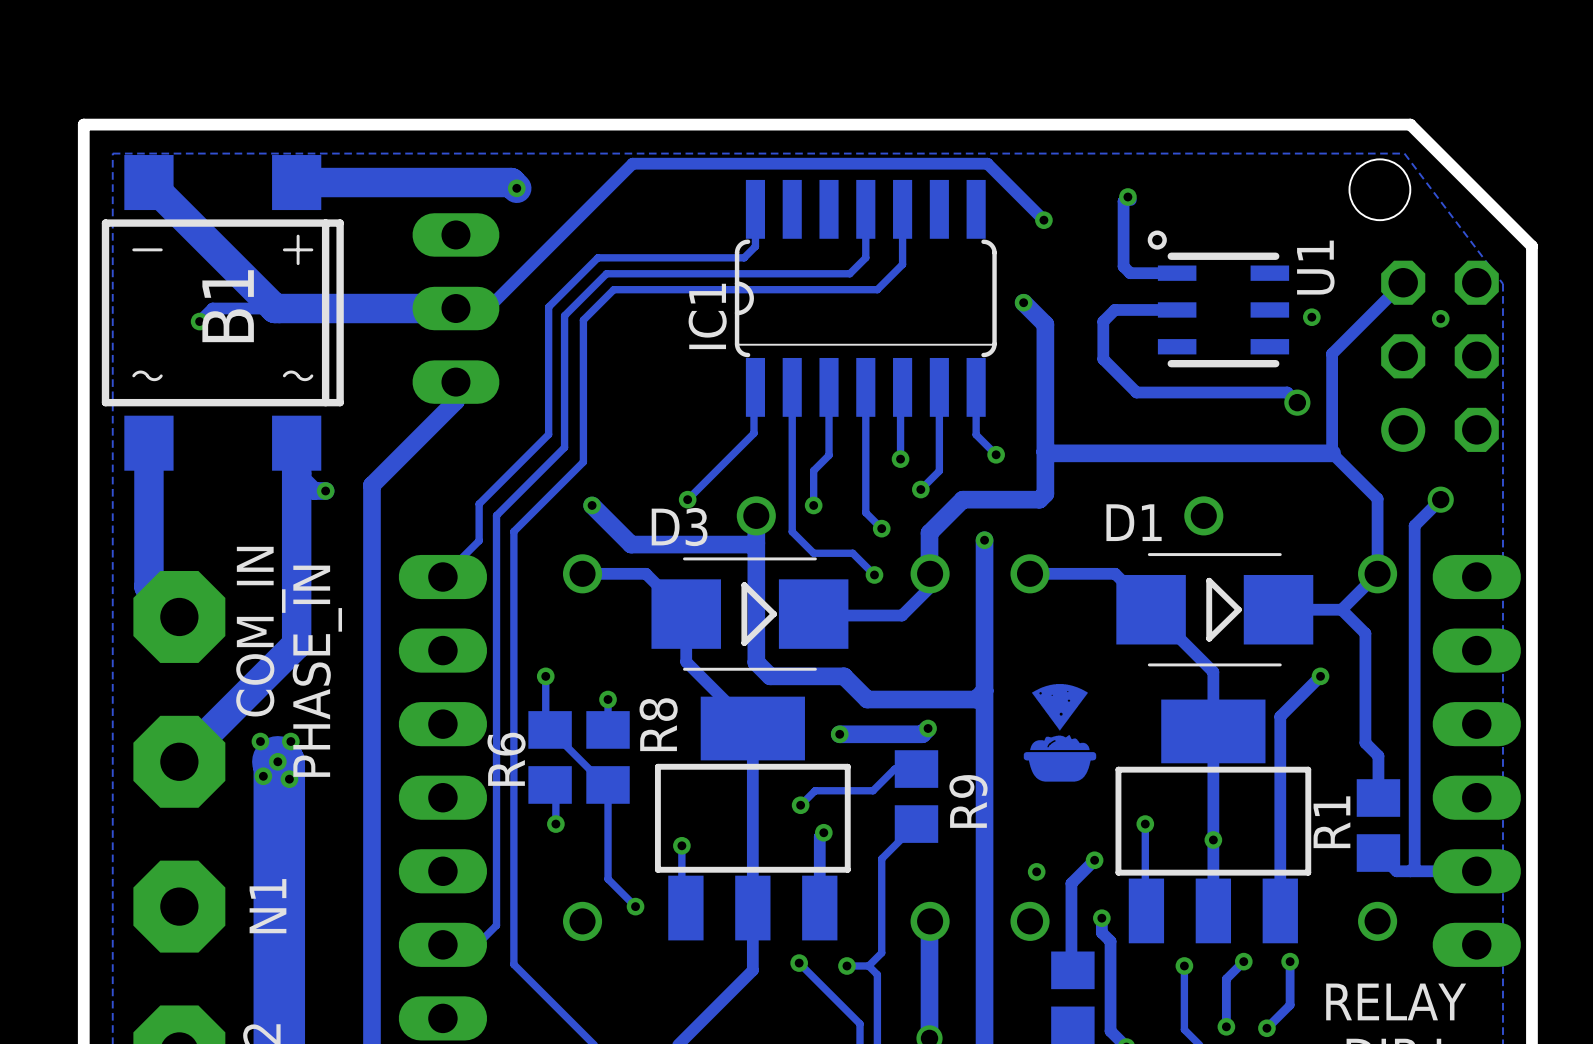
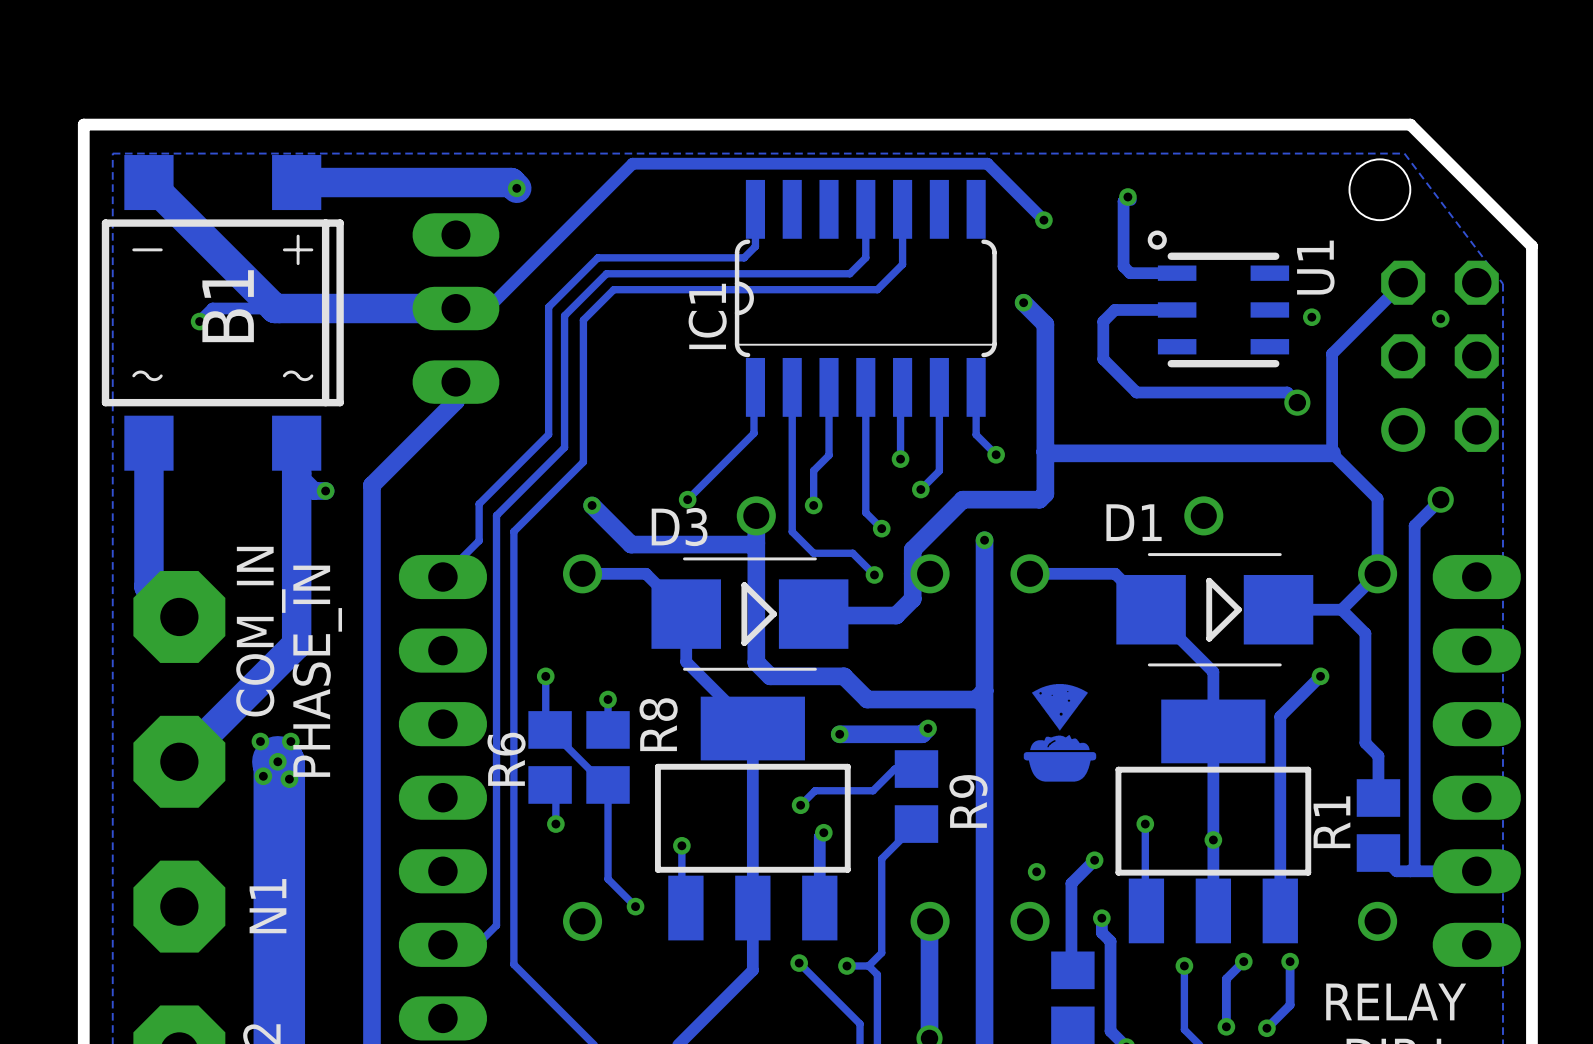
track: (929, 532) (930, 587) (902, 615) (896, 615) -> (929, 532) (912, 549) (912, 599) (896, 615)
track width: thin (896, 615) (815, 615) -> thick (896, 615) (815, 615)

